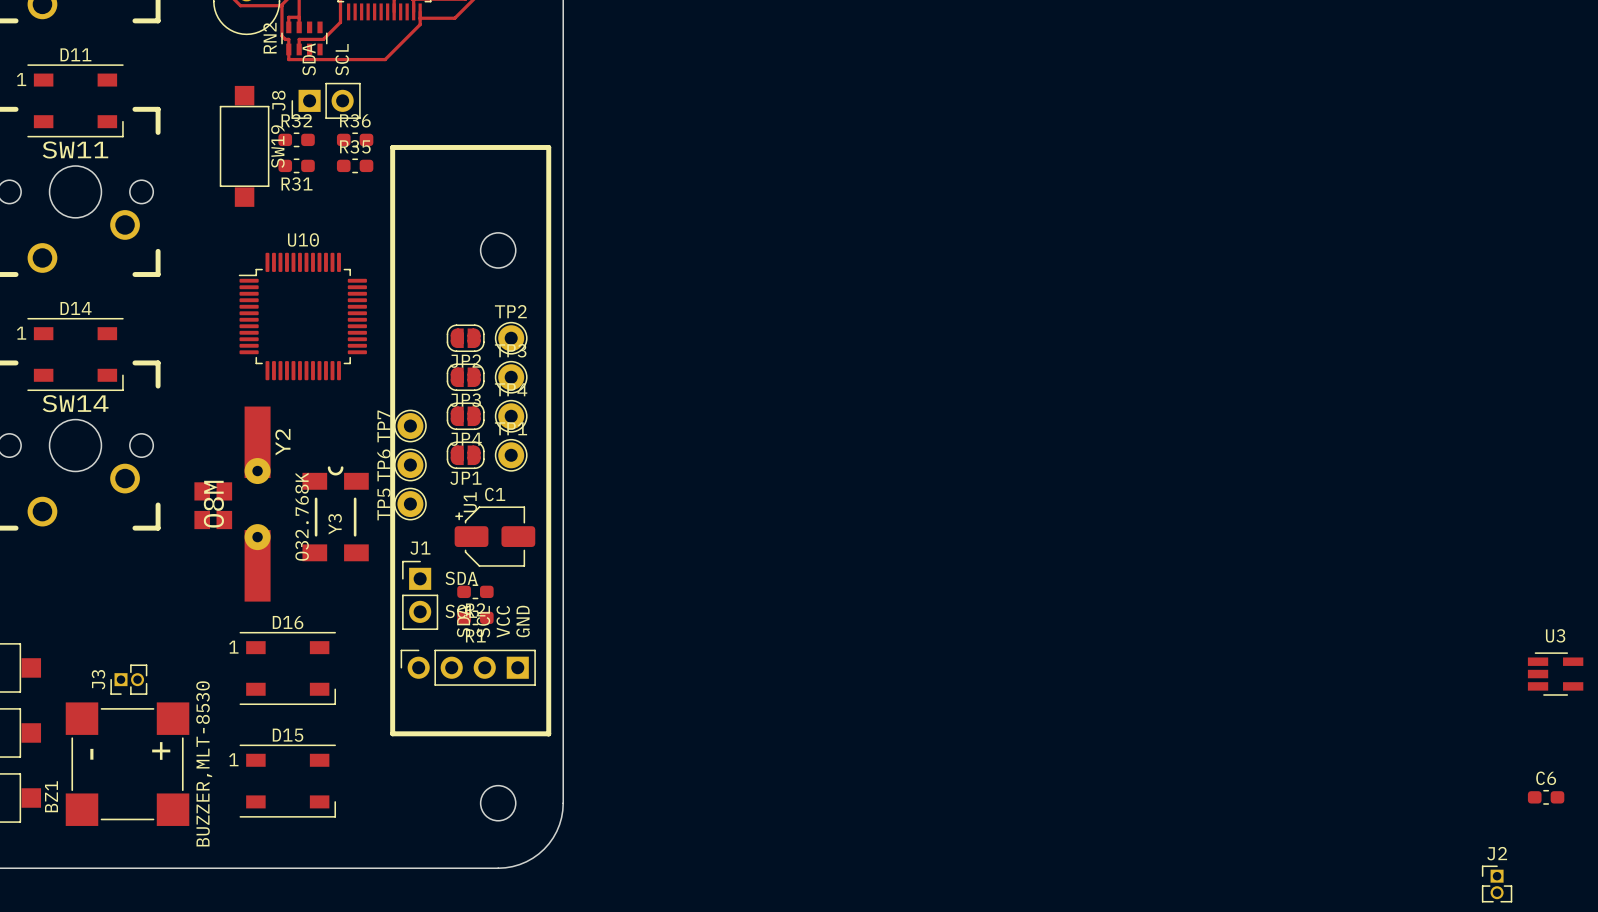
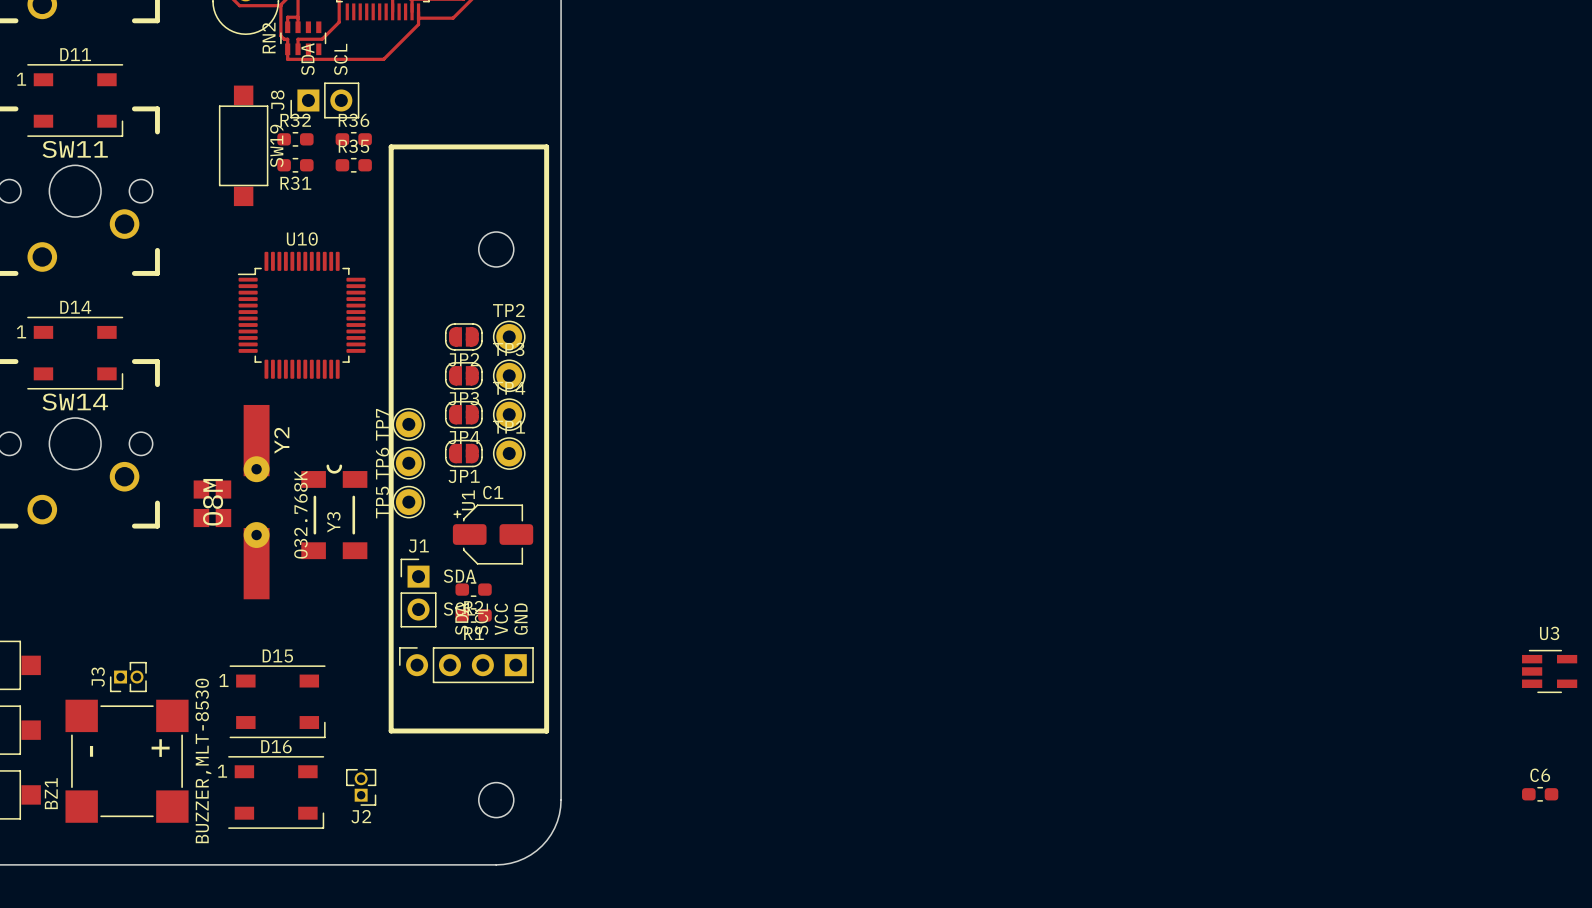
D16 position: (287, 668) -> (276, 792)
D15 position: (287, 781) -> (277, 701)
J2 rotation: 0° (1497, 884) -> 180° (361, 787)
J2 position: (1497, 884) -> (361, 787)

